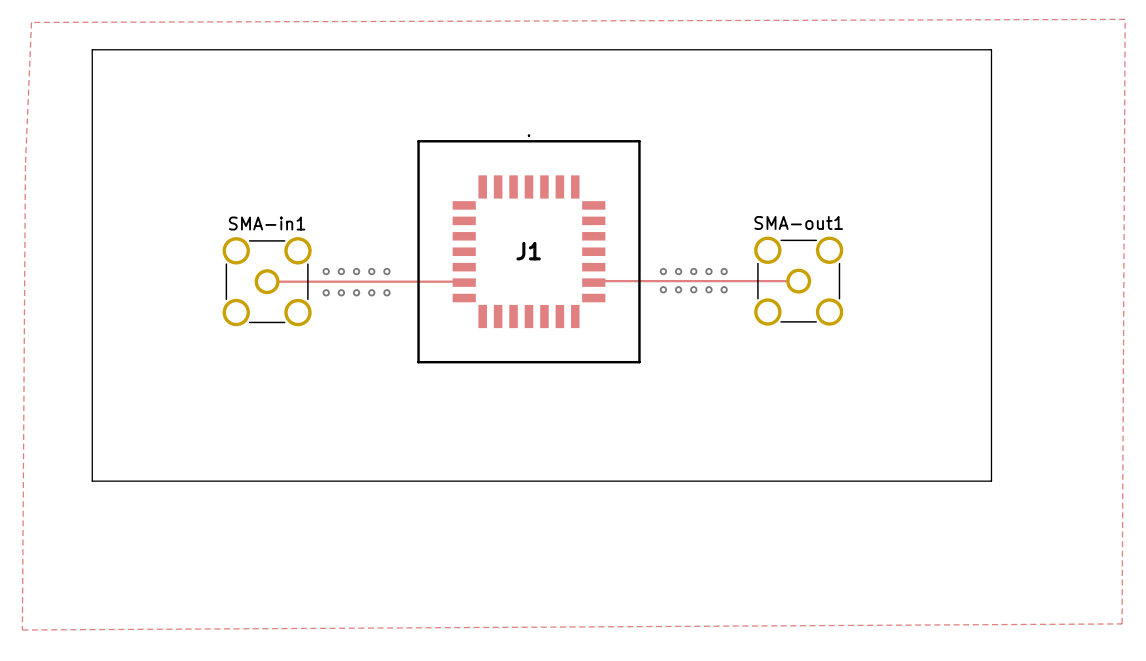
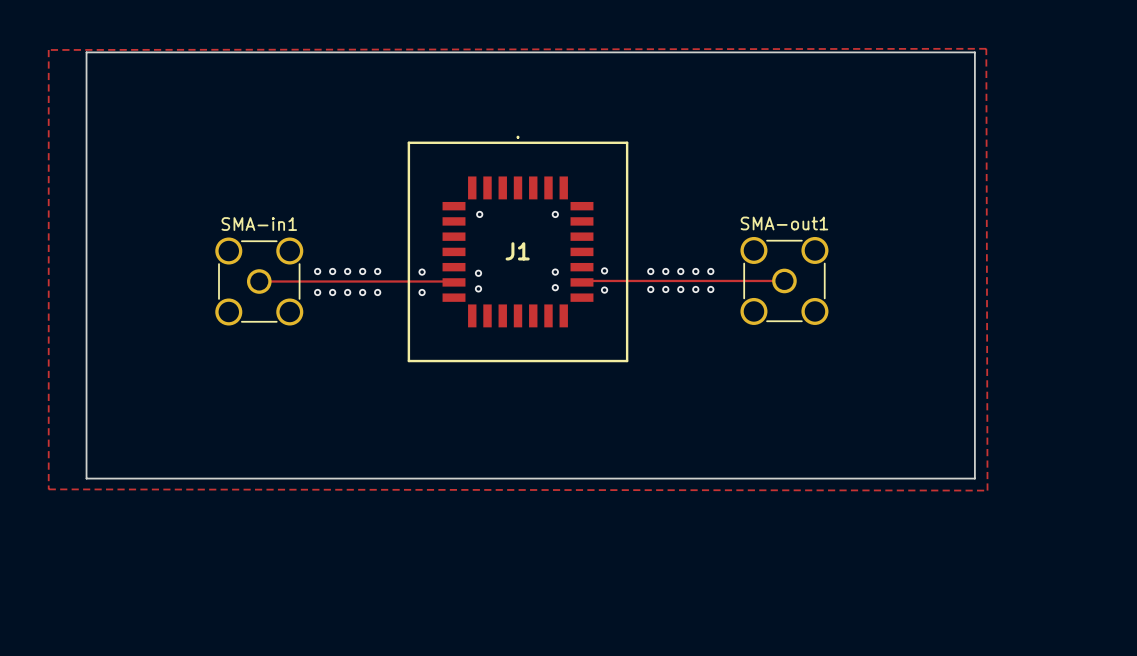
zone outline: (1125, 19) (1122, 623) (22, 630) (25, 165) (31, 22) (1125, 19) -> (986, 48) (48, 49) (48, 489) (987, 490) (986, 48)
via: none -> (479, 214)
via: none -> (555, 214)
via: none -> (604, 270)
via: none -> (422, 272)
via: none -> (555, 272)
via: none -> (478, 273)
via: none -> (555, 287)
via: none -> (478, 288)
via: none -> (604, 290)
via: none -> (422, 292)

